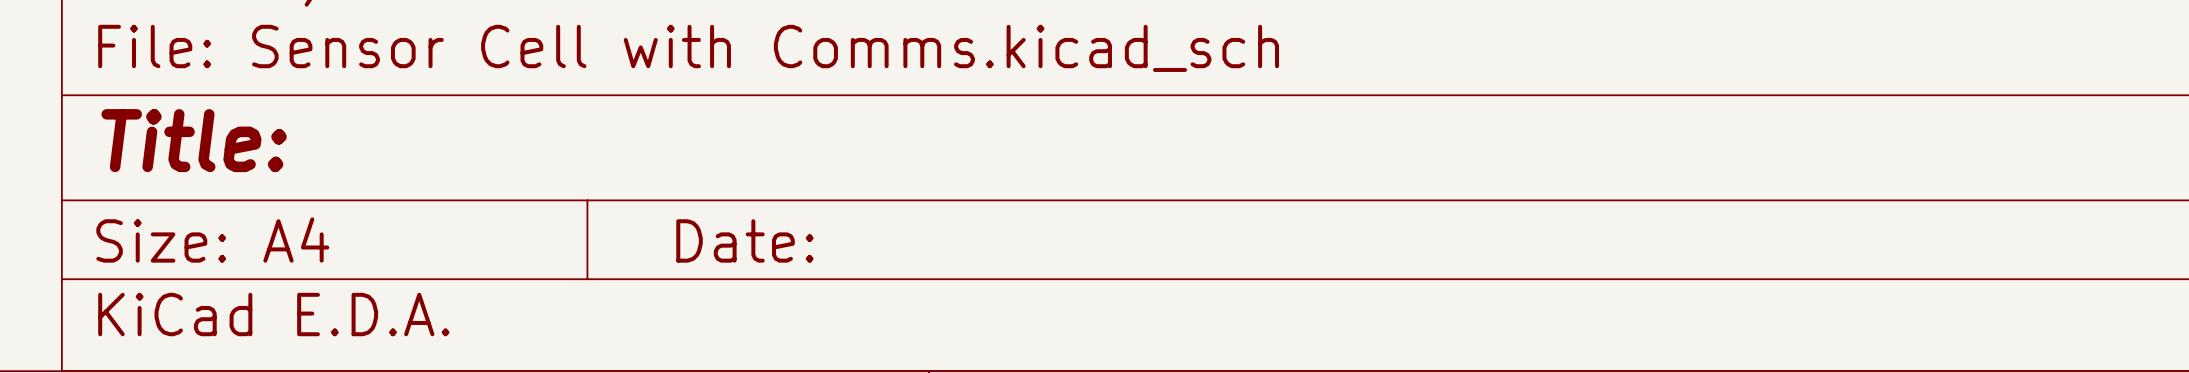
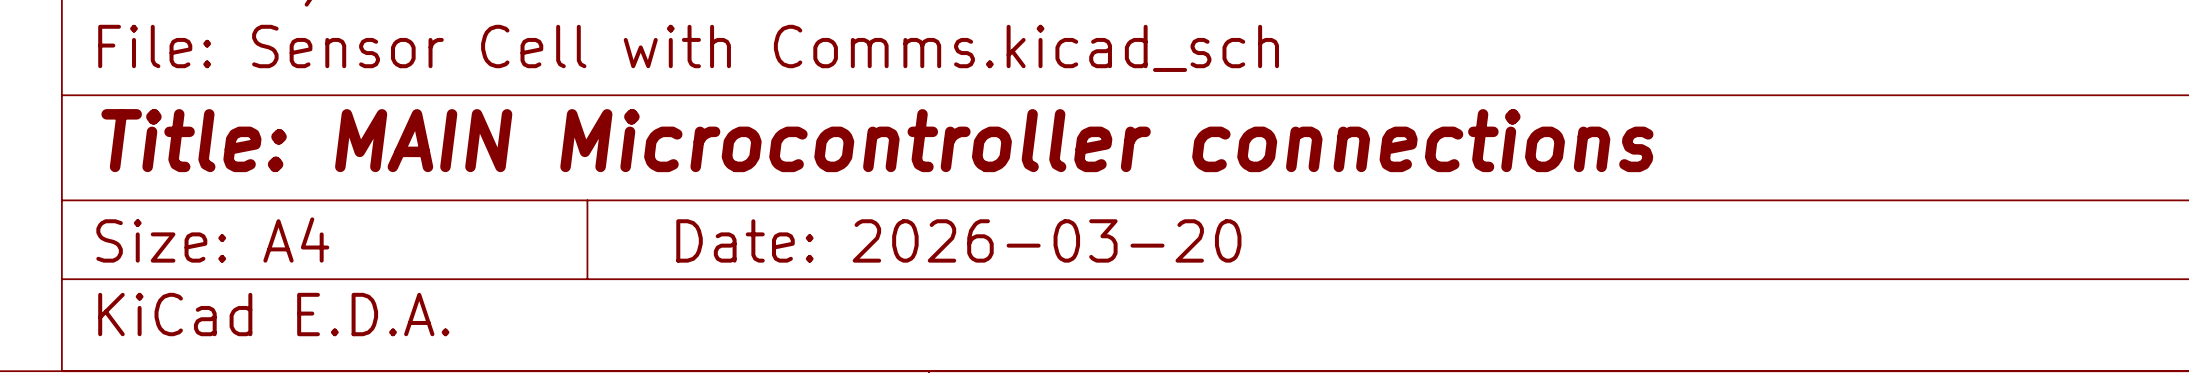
title block: Title: (194, 140) -> Title: MAIN Microcontroller connections (877, 140)
title block: Date: (744, 240) -> Date: 2026-03-20 (958, 240)

